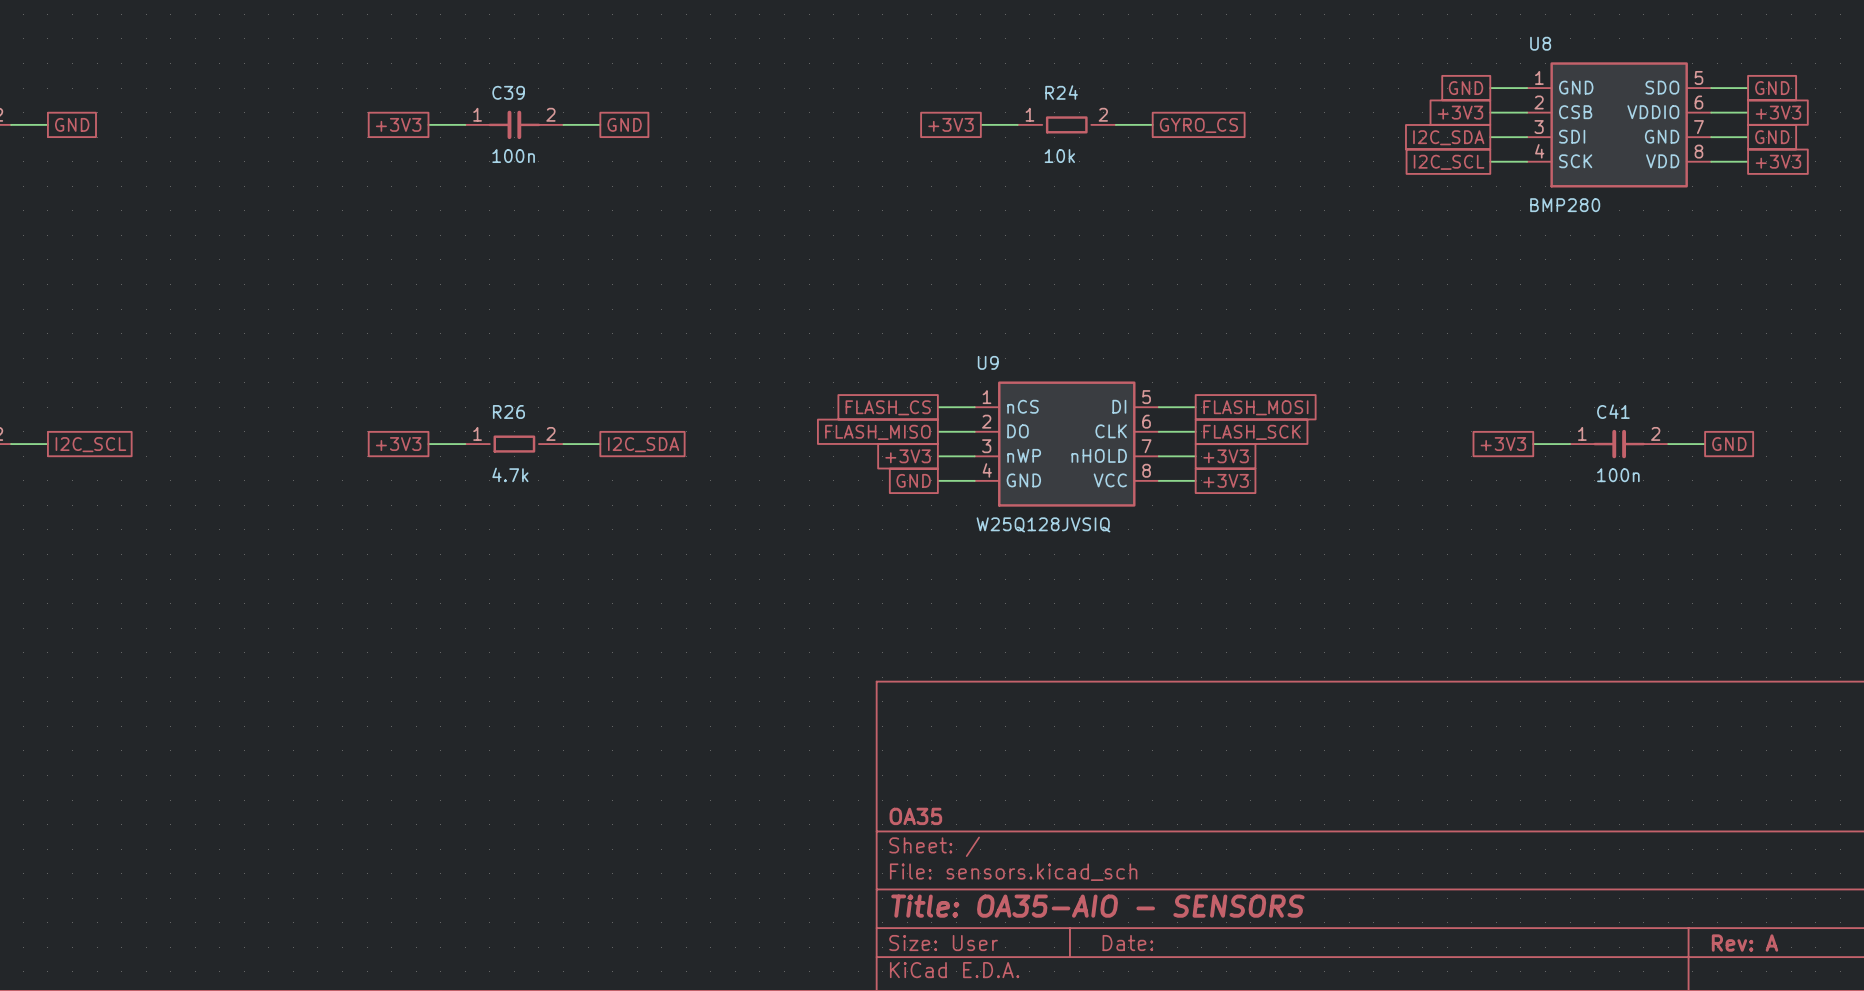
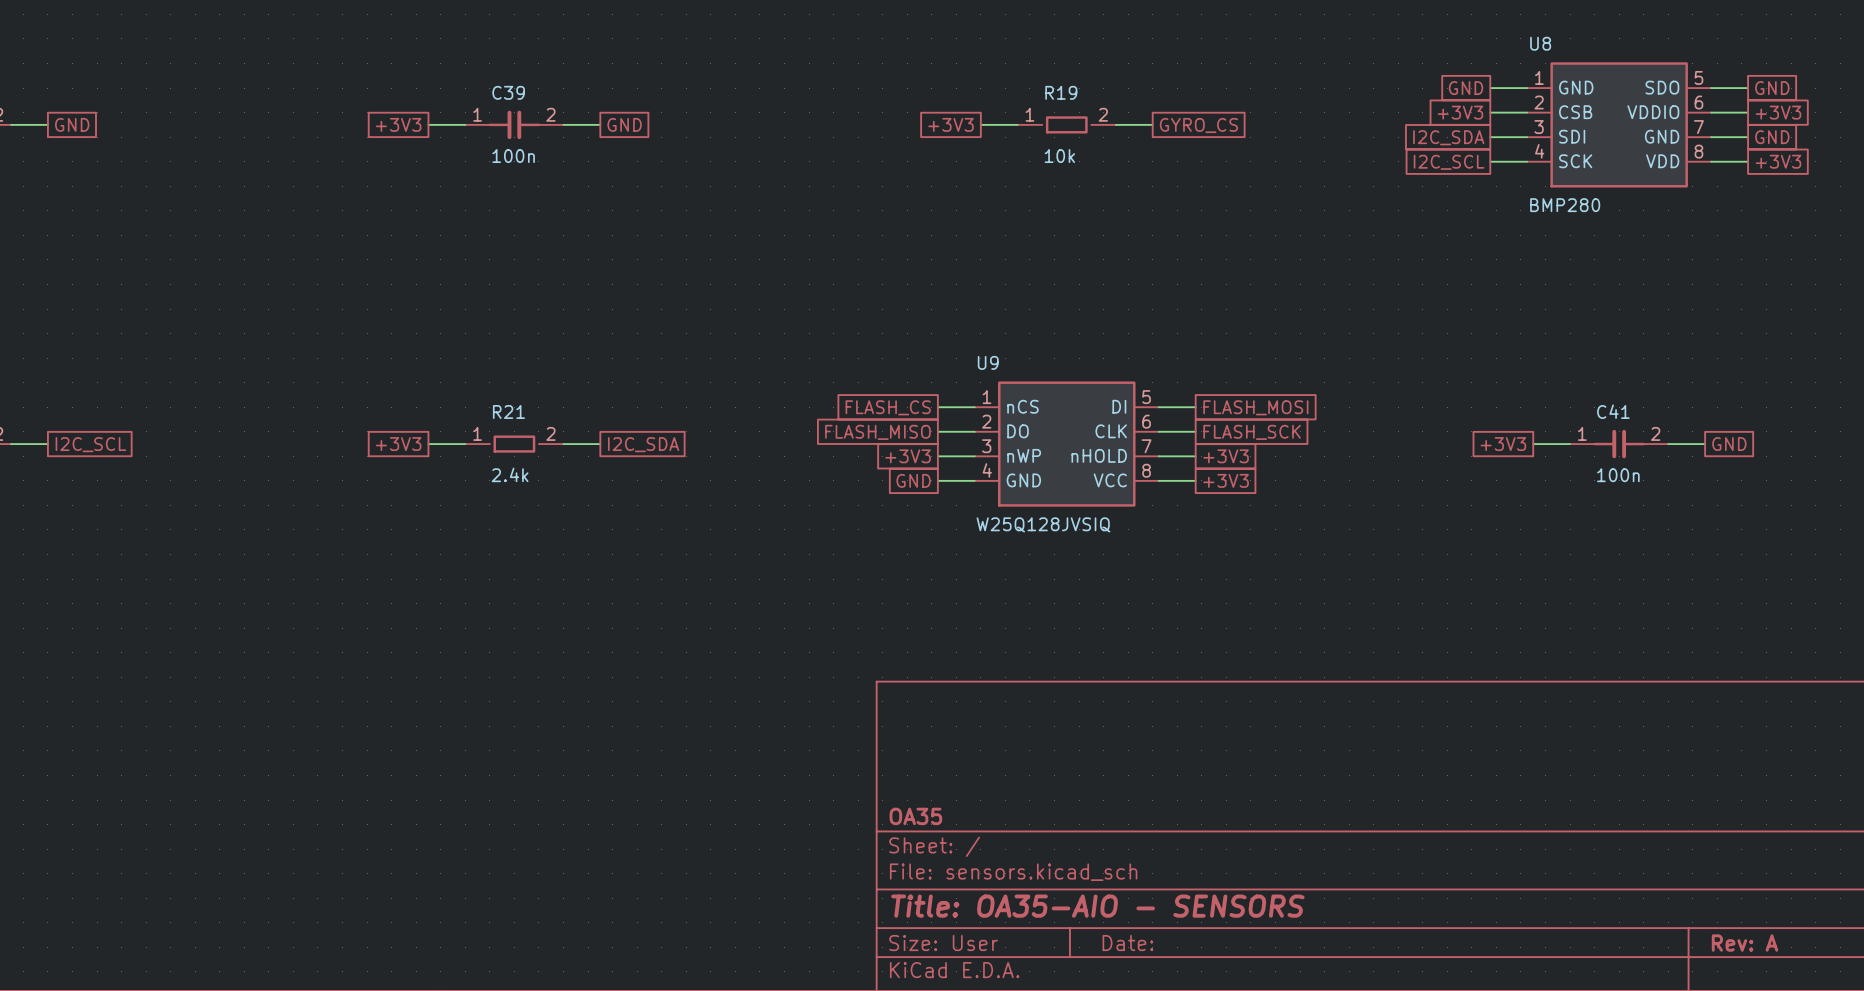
R24 name: R24 (1061, 92) -> R19 (1061, 92)
R26 name: R26 (508, 411) -> R21 (508, 411)
R26 value: 4.7k (510, 474) -> 2.4k (510, 474)

